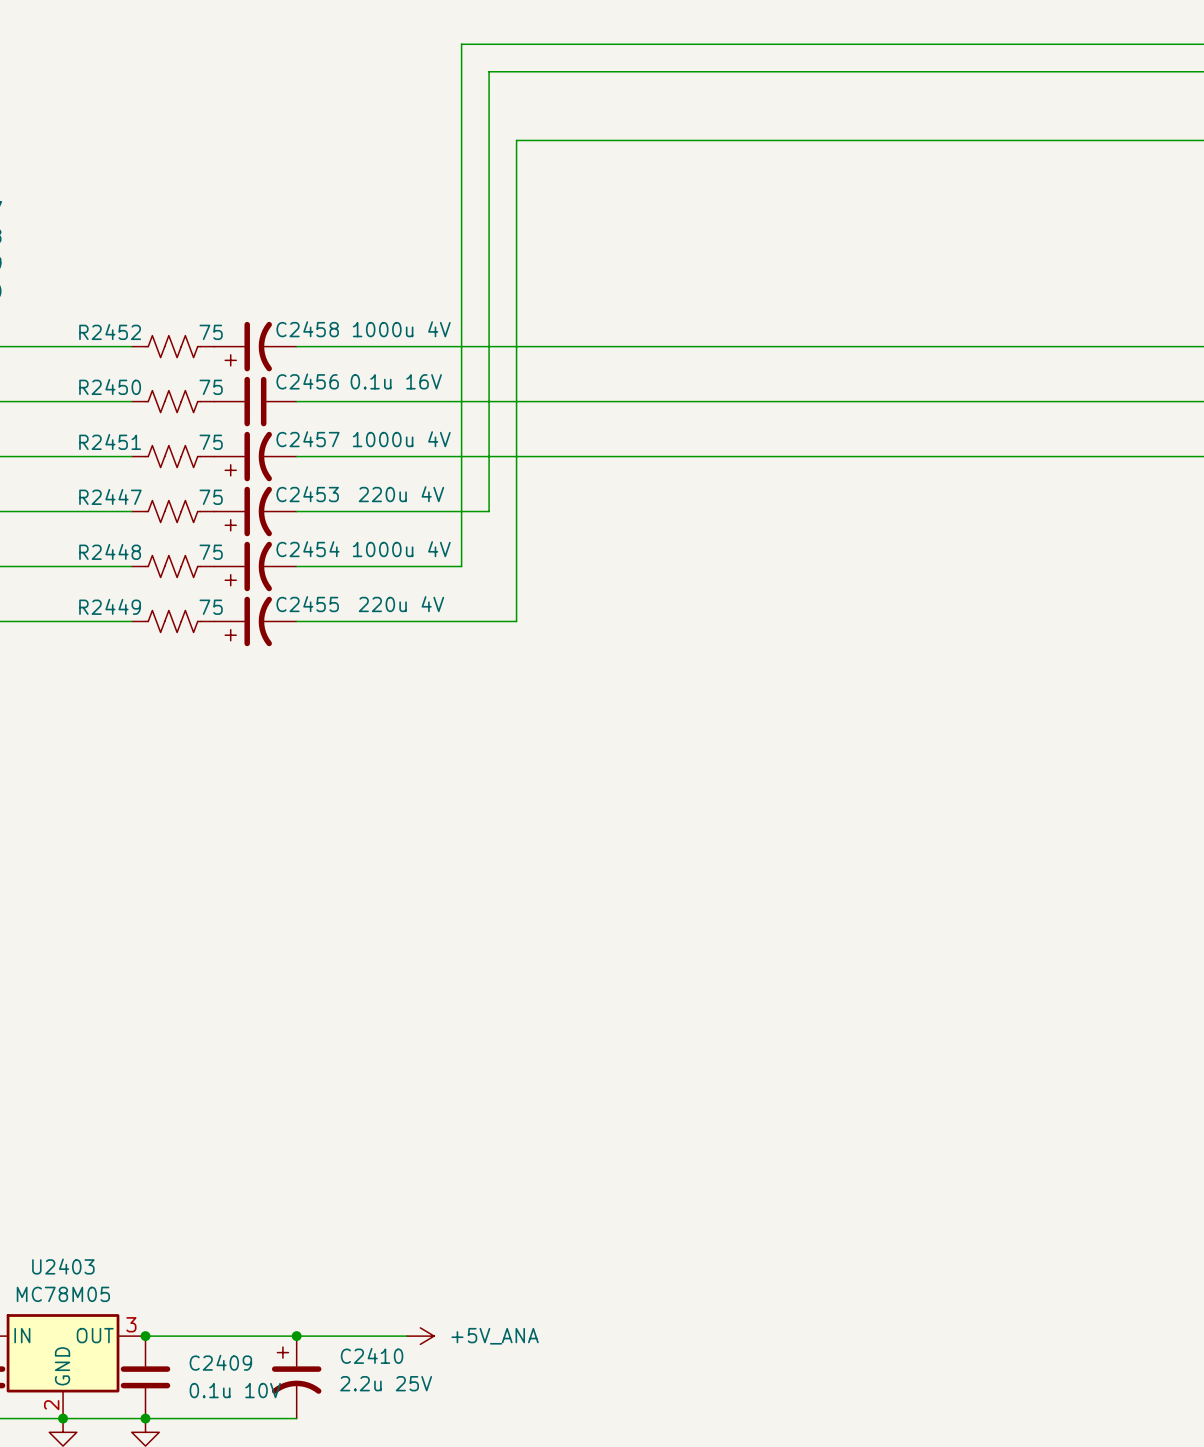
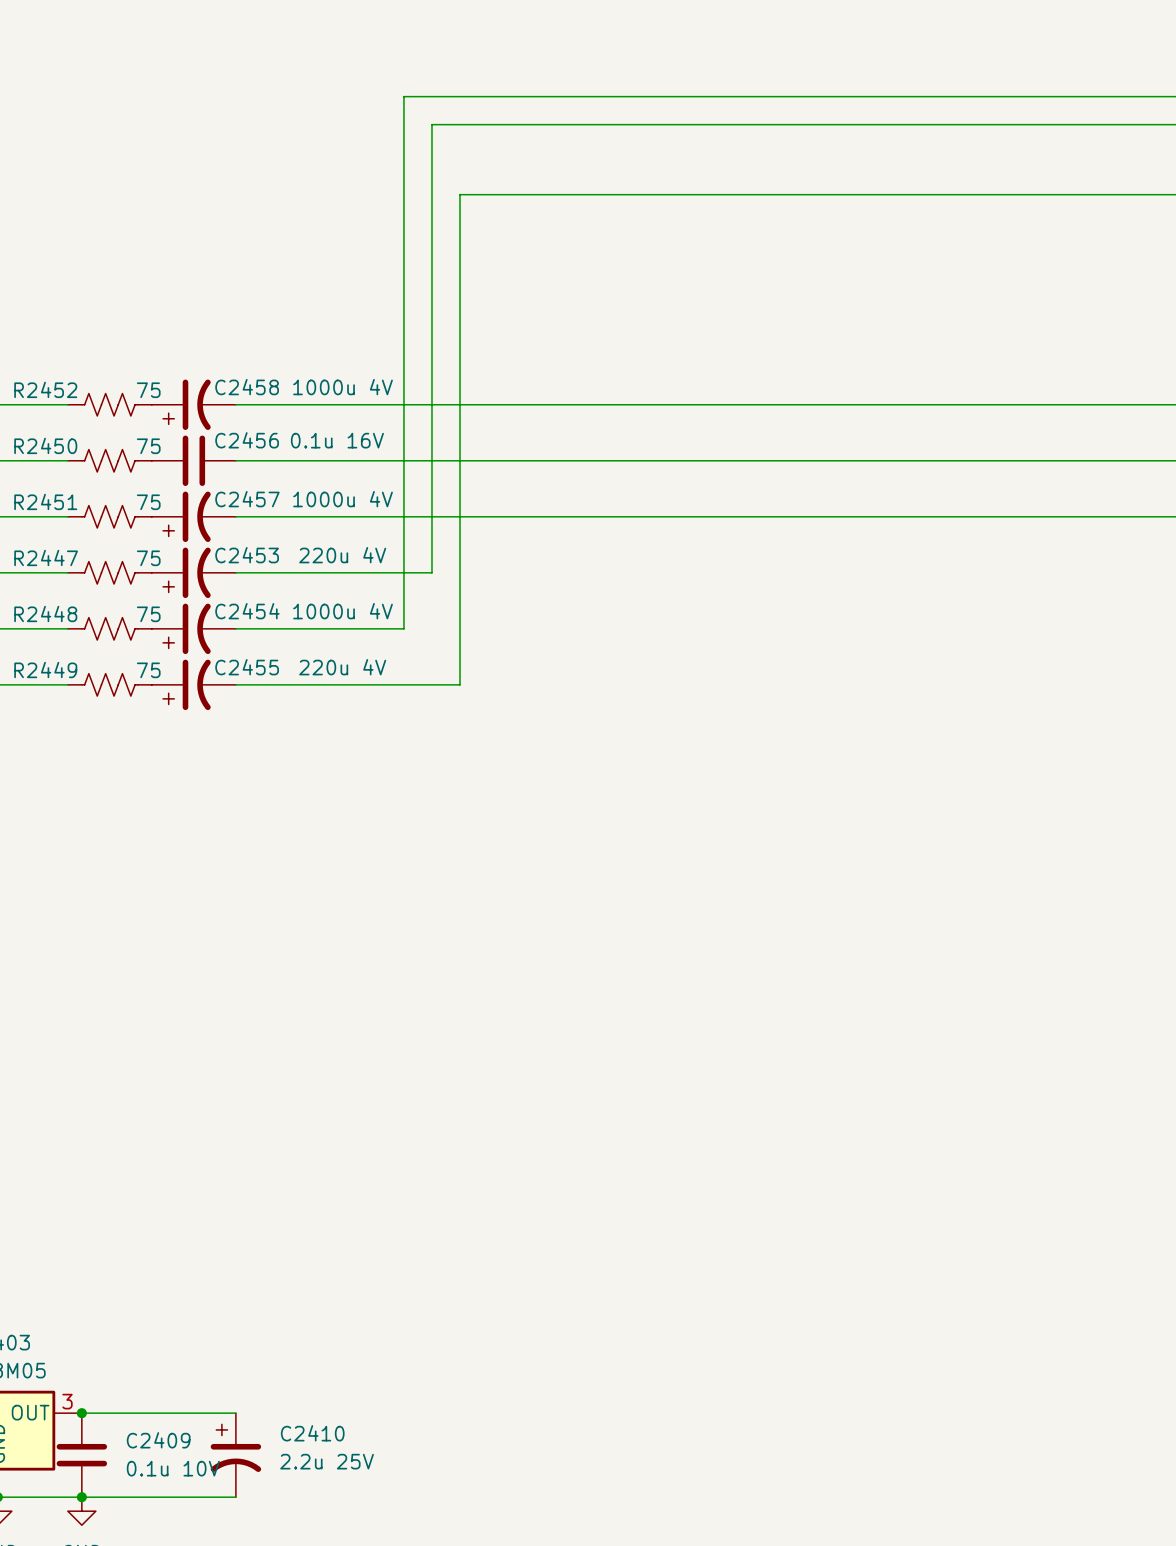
wire: (296, 1336) (406, 1336) -> none
junction: (296, 1336) -> none
power symbol: +5V_ANA (420, 1336) -> none

